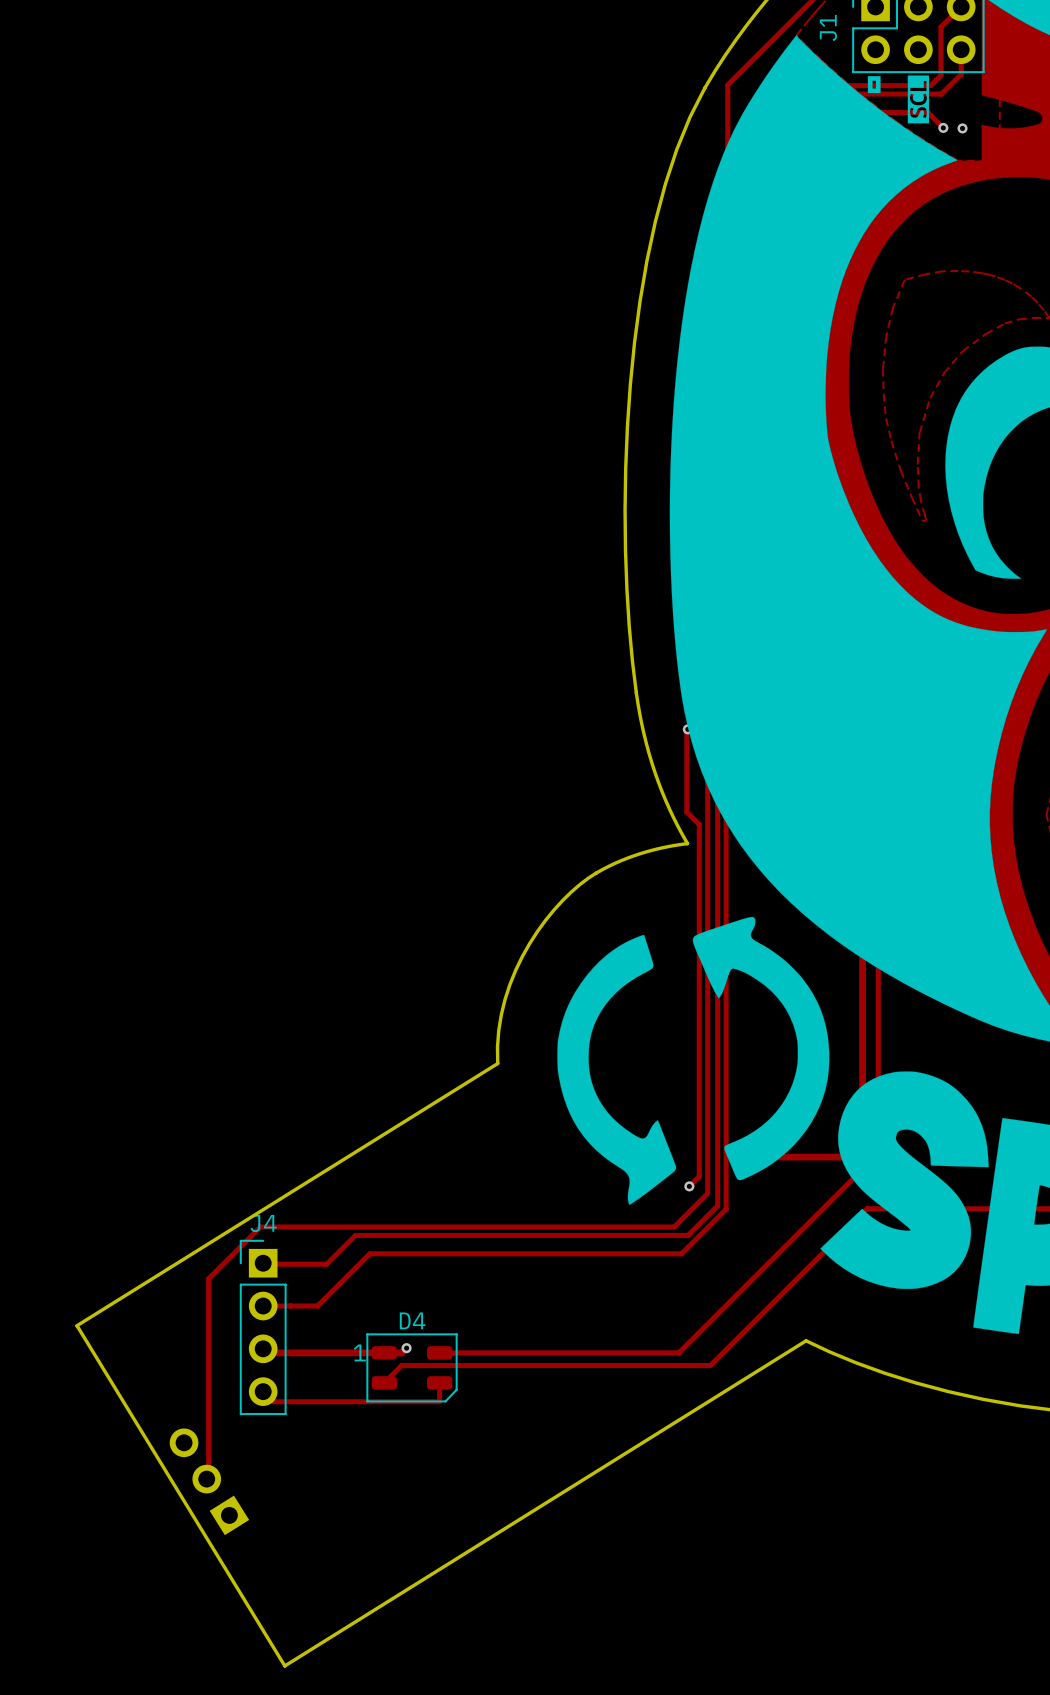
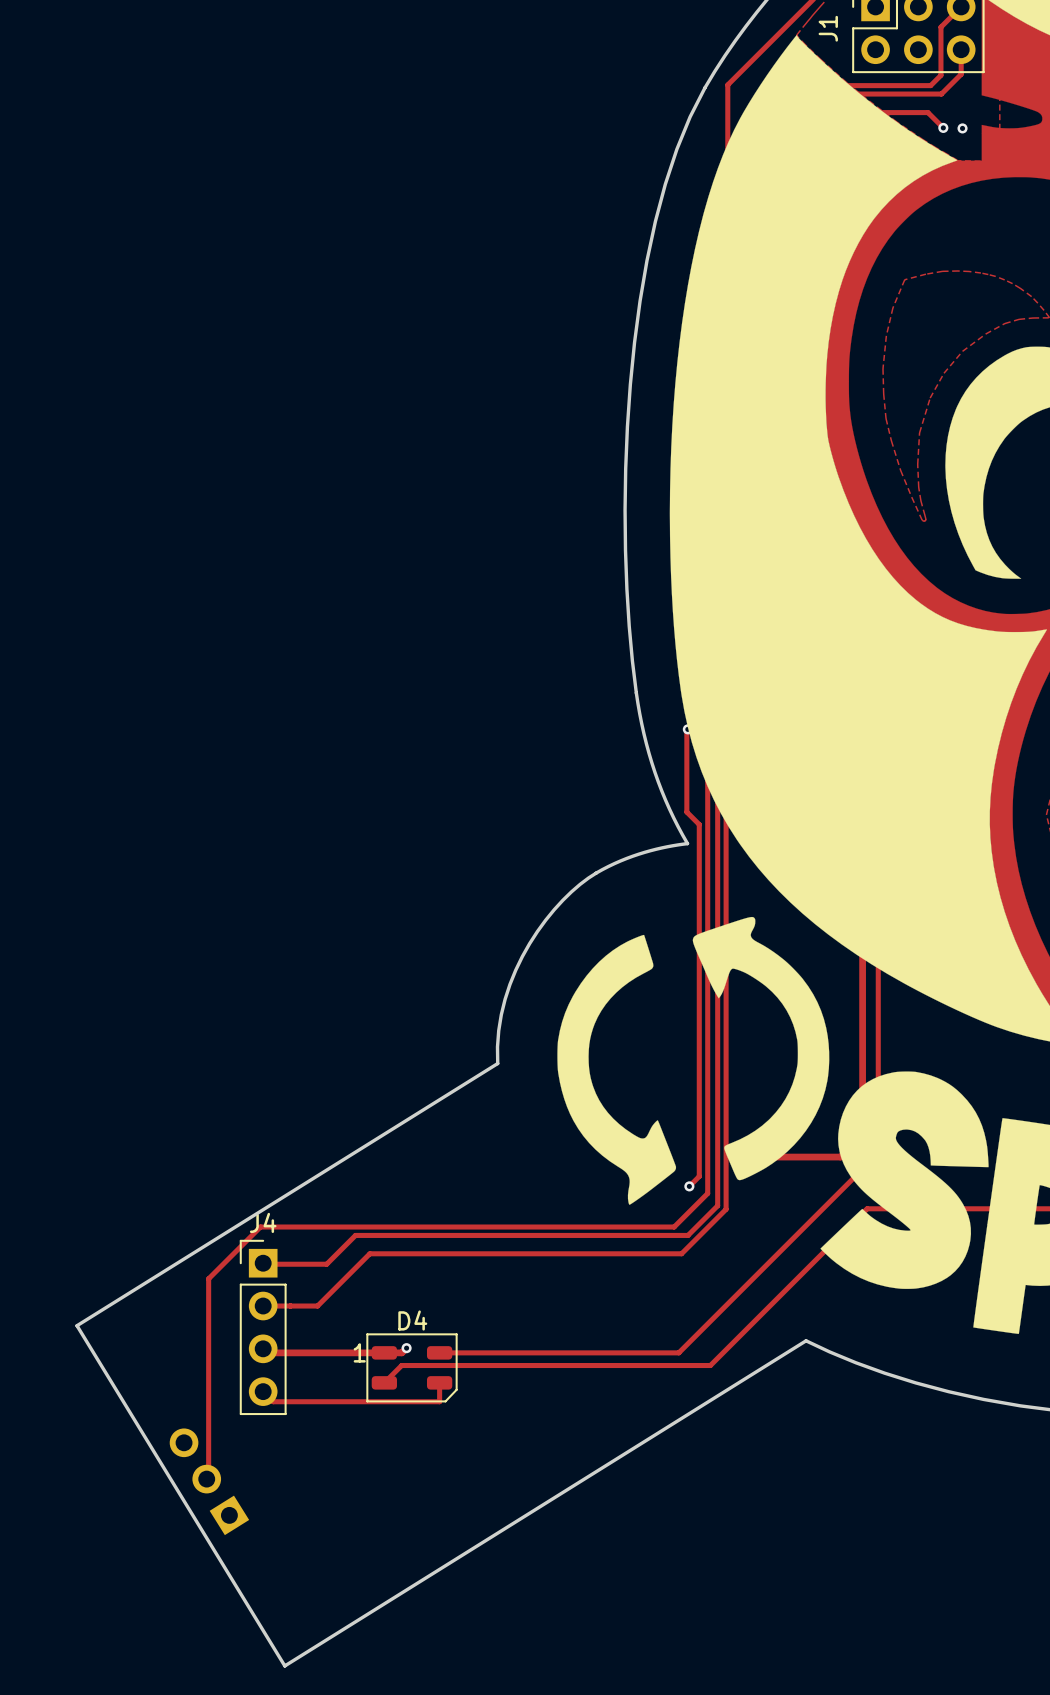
drawing: [907, 75, 929, 124] -> none
drawing: [867, 76, 881, 94] -> none

